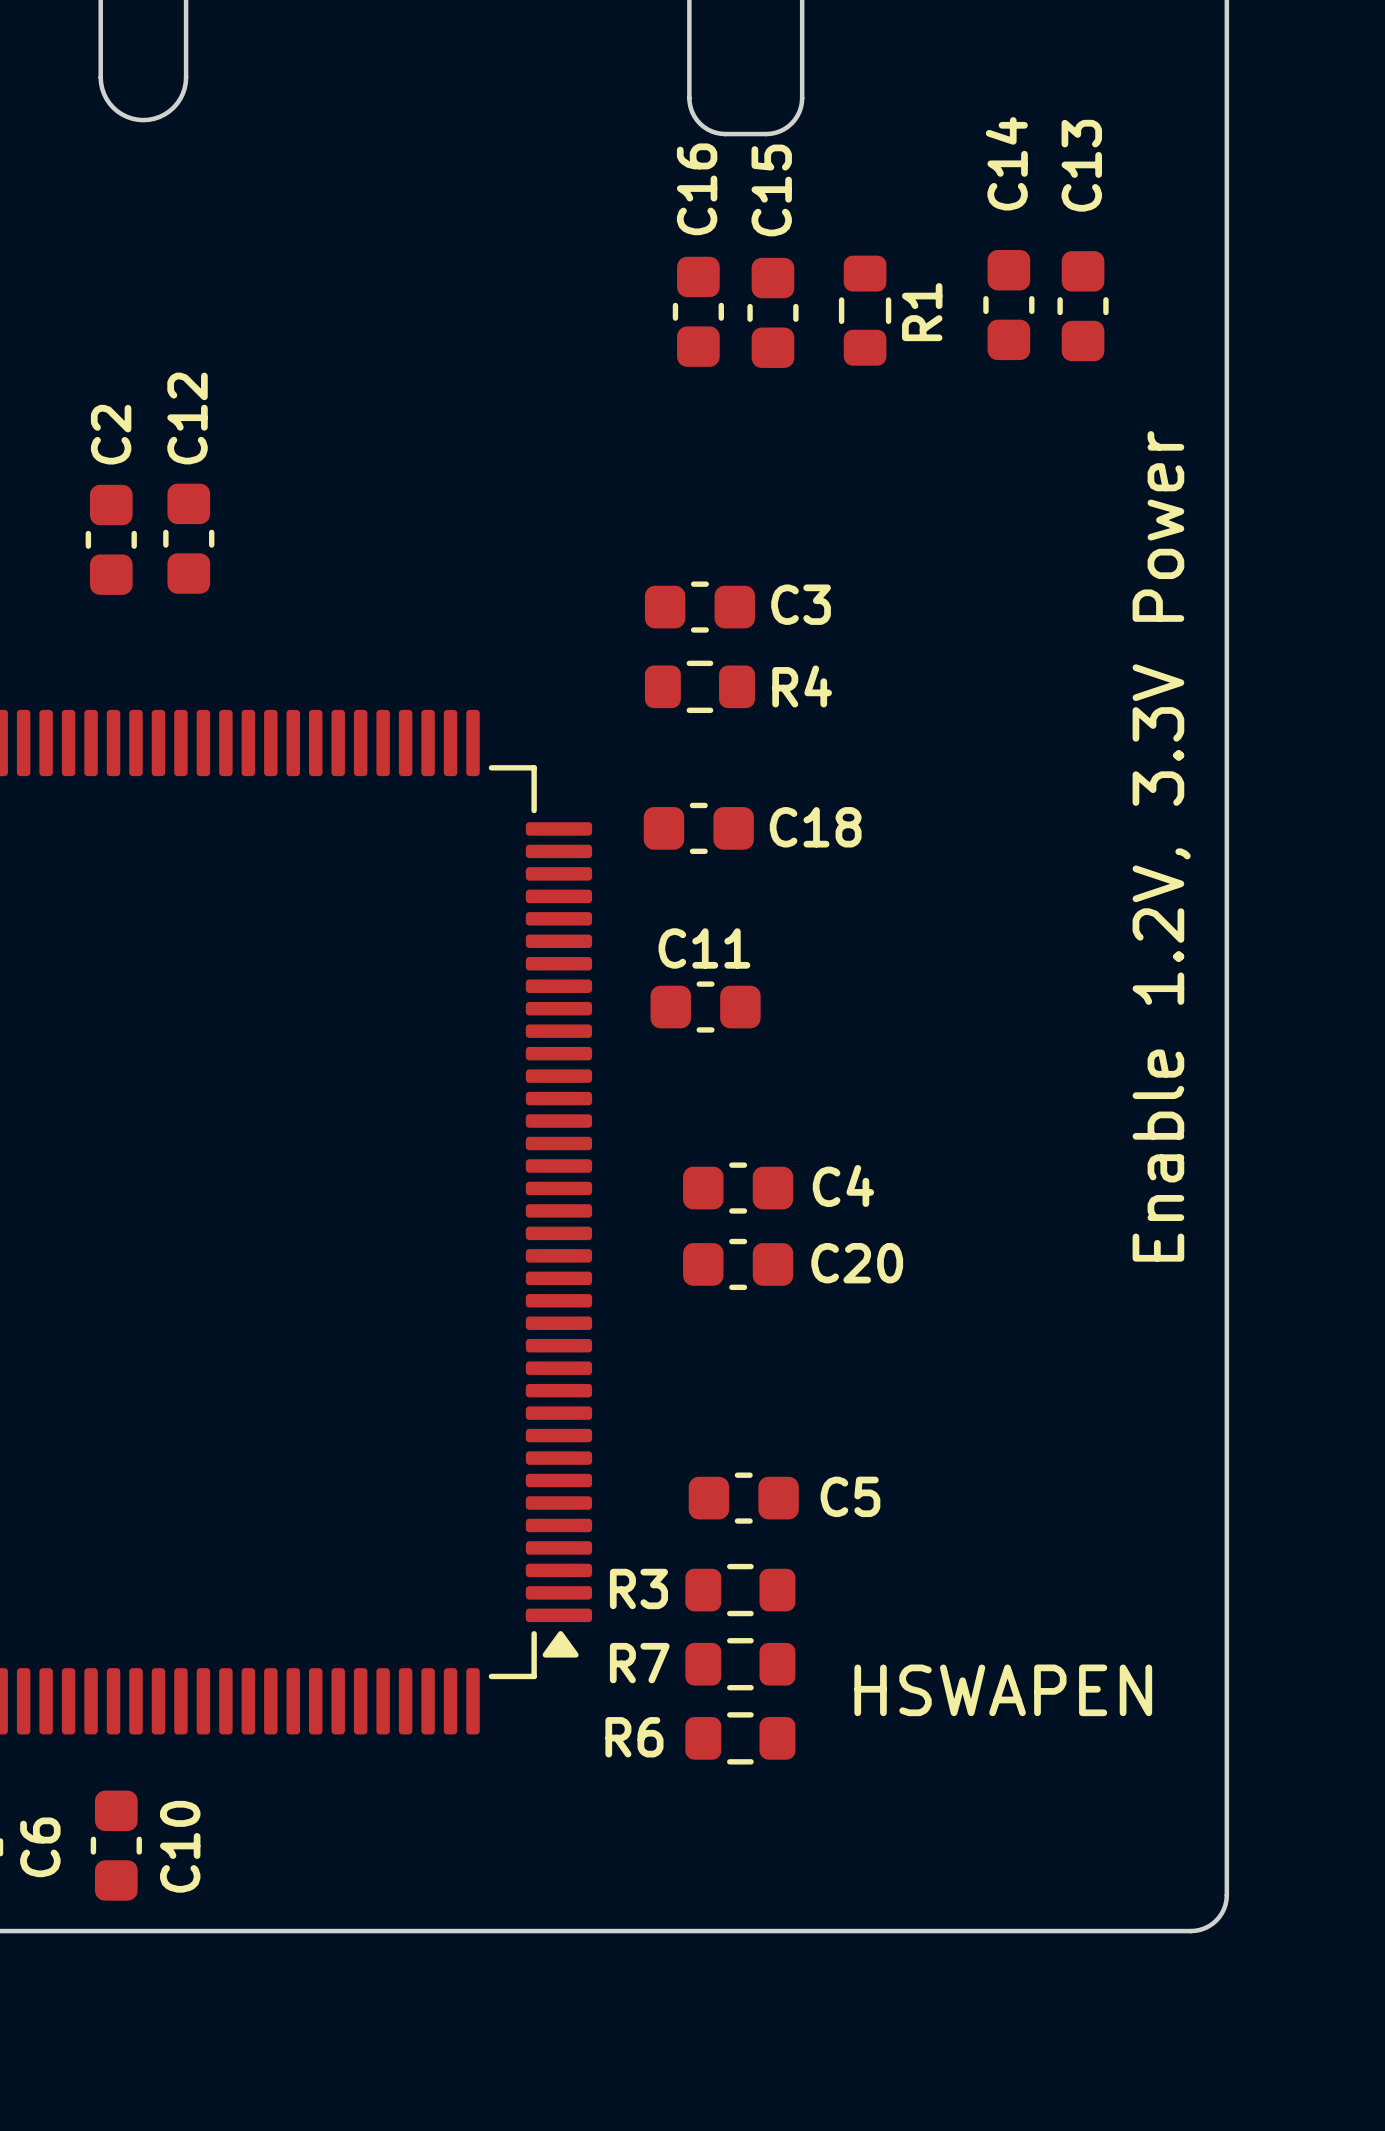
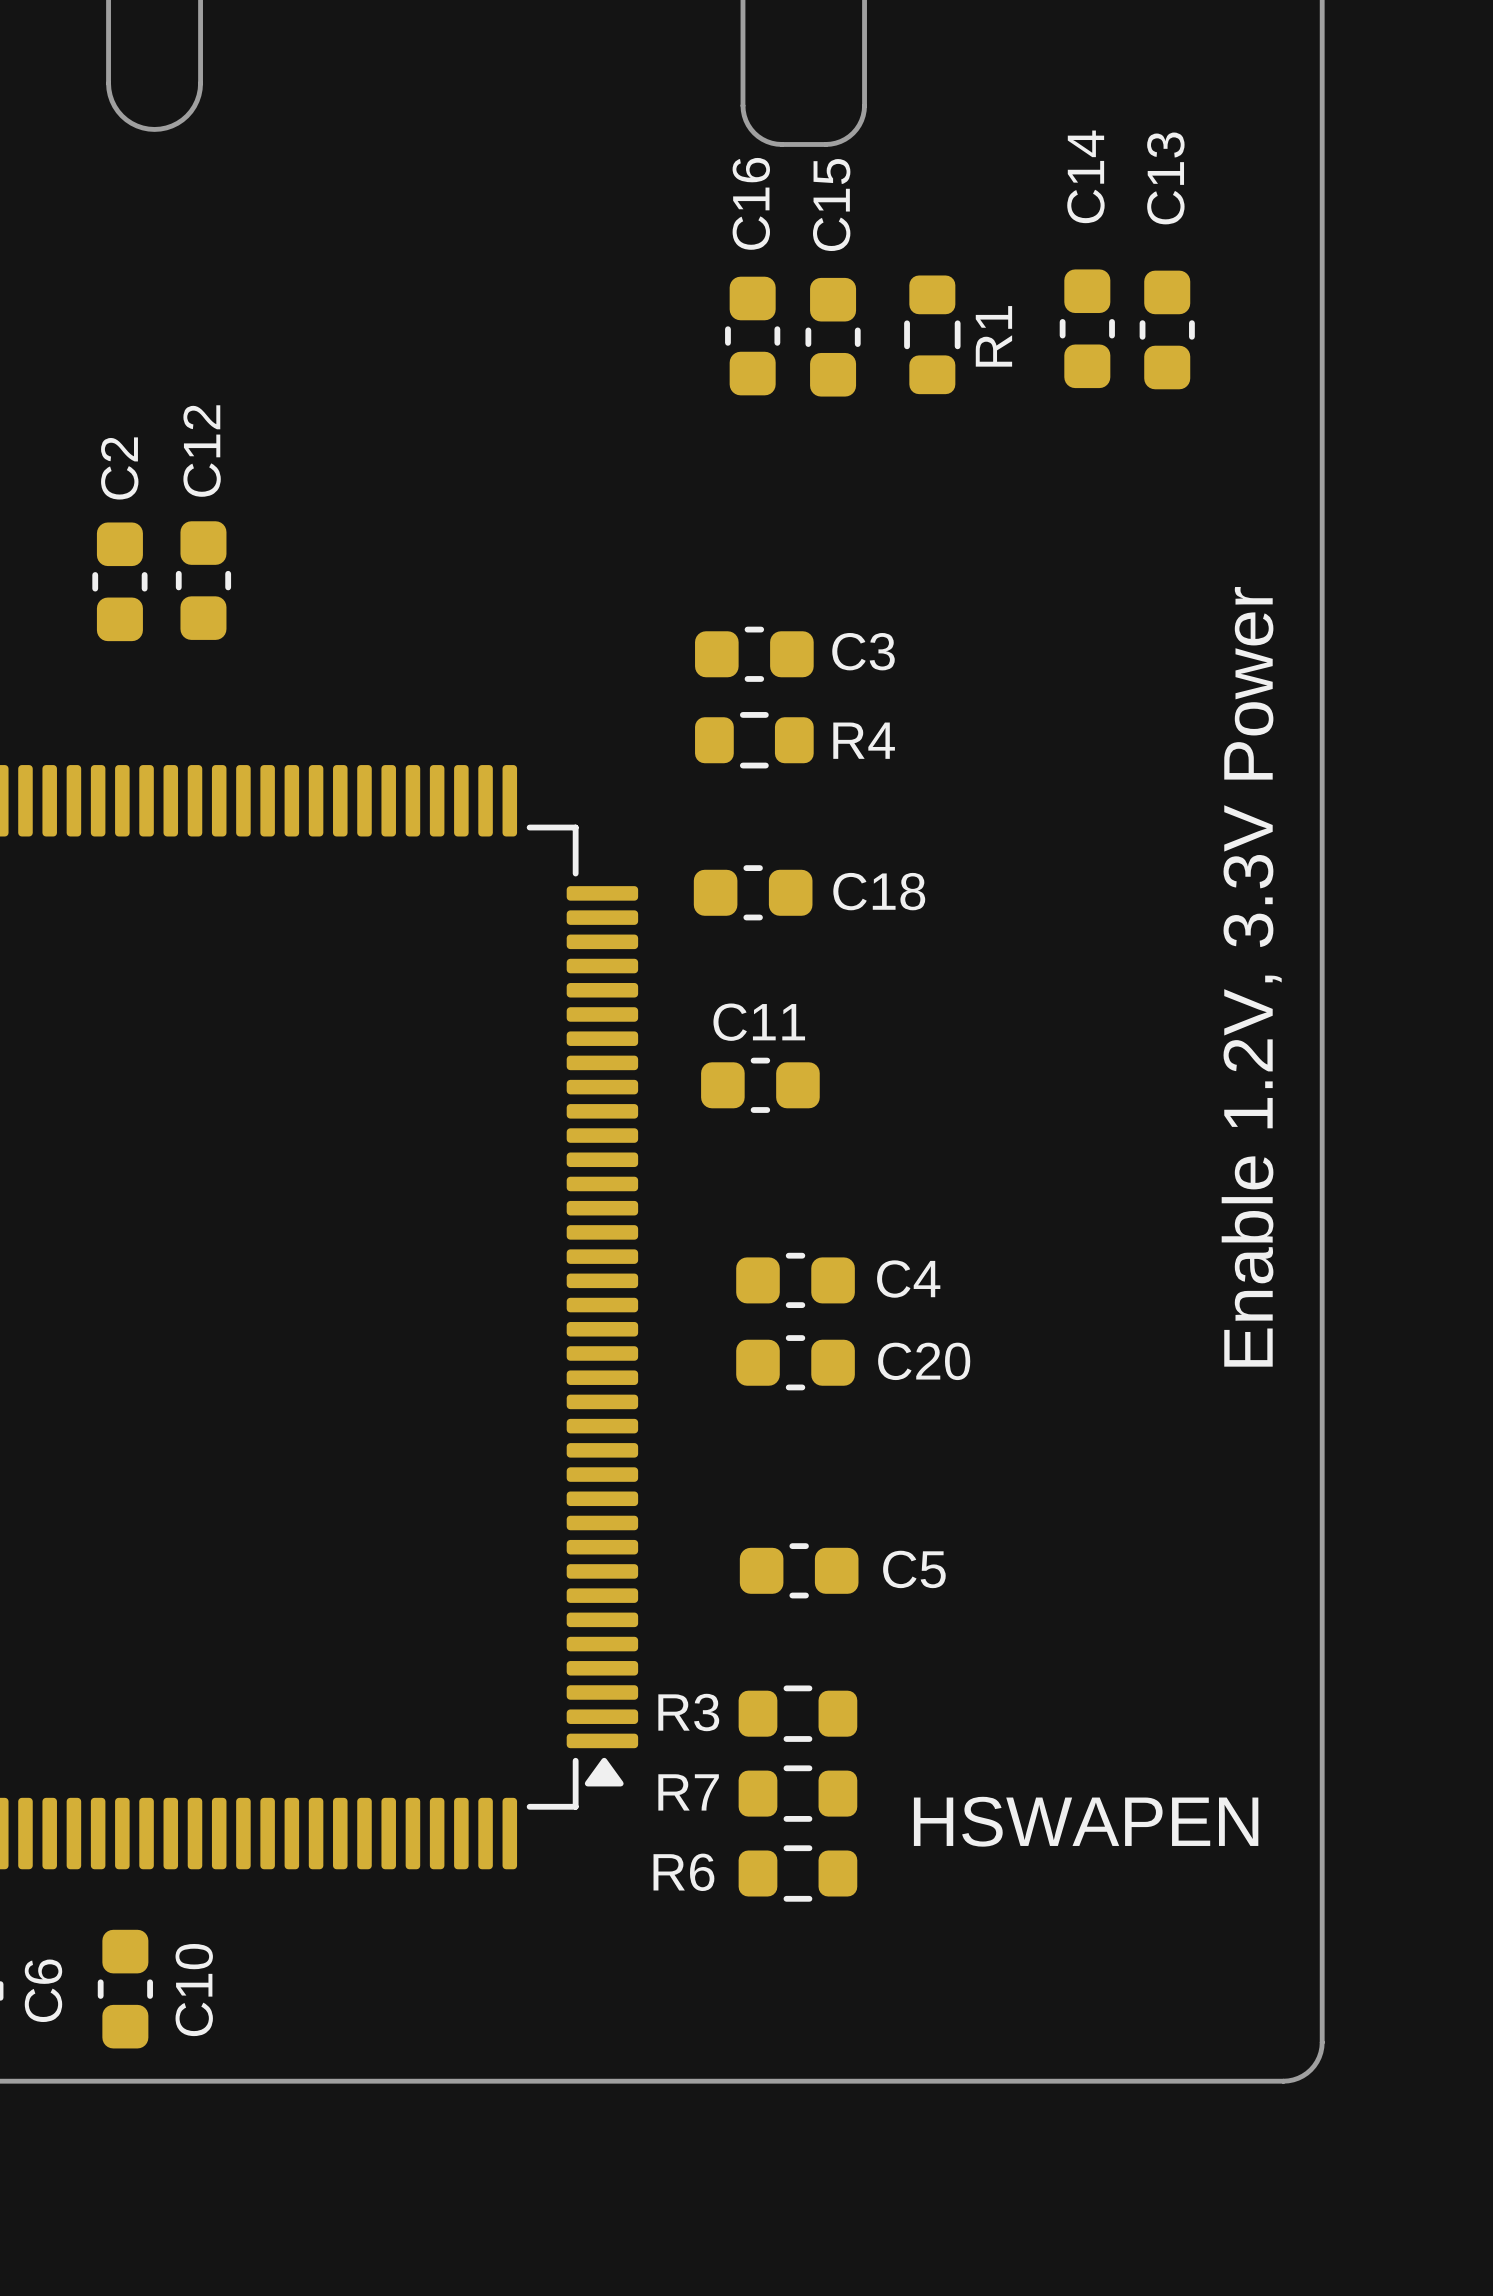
C5 position: (743, 1498) -> (799, 1570)

